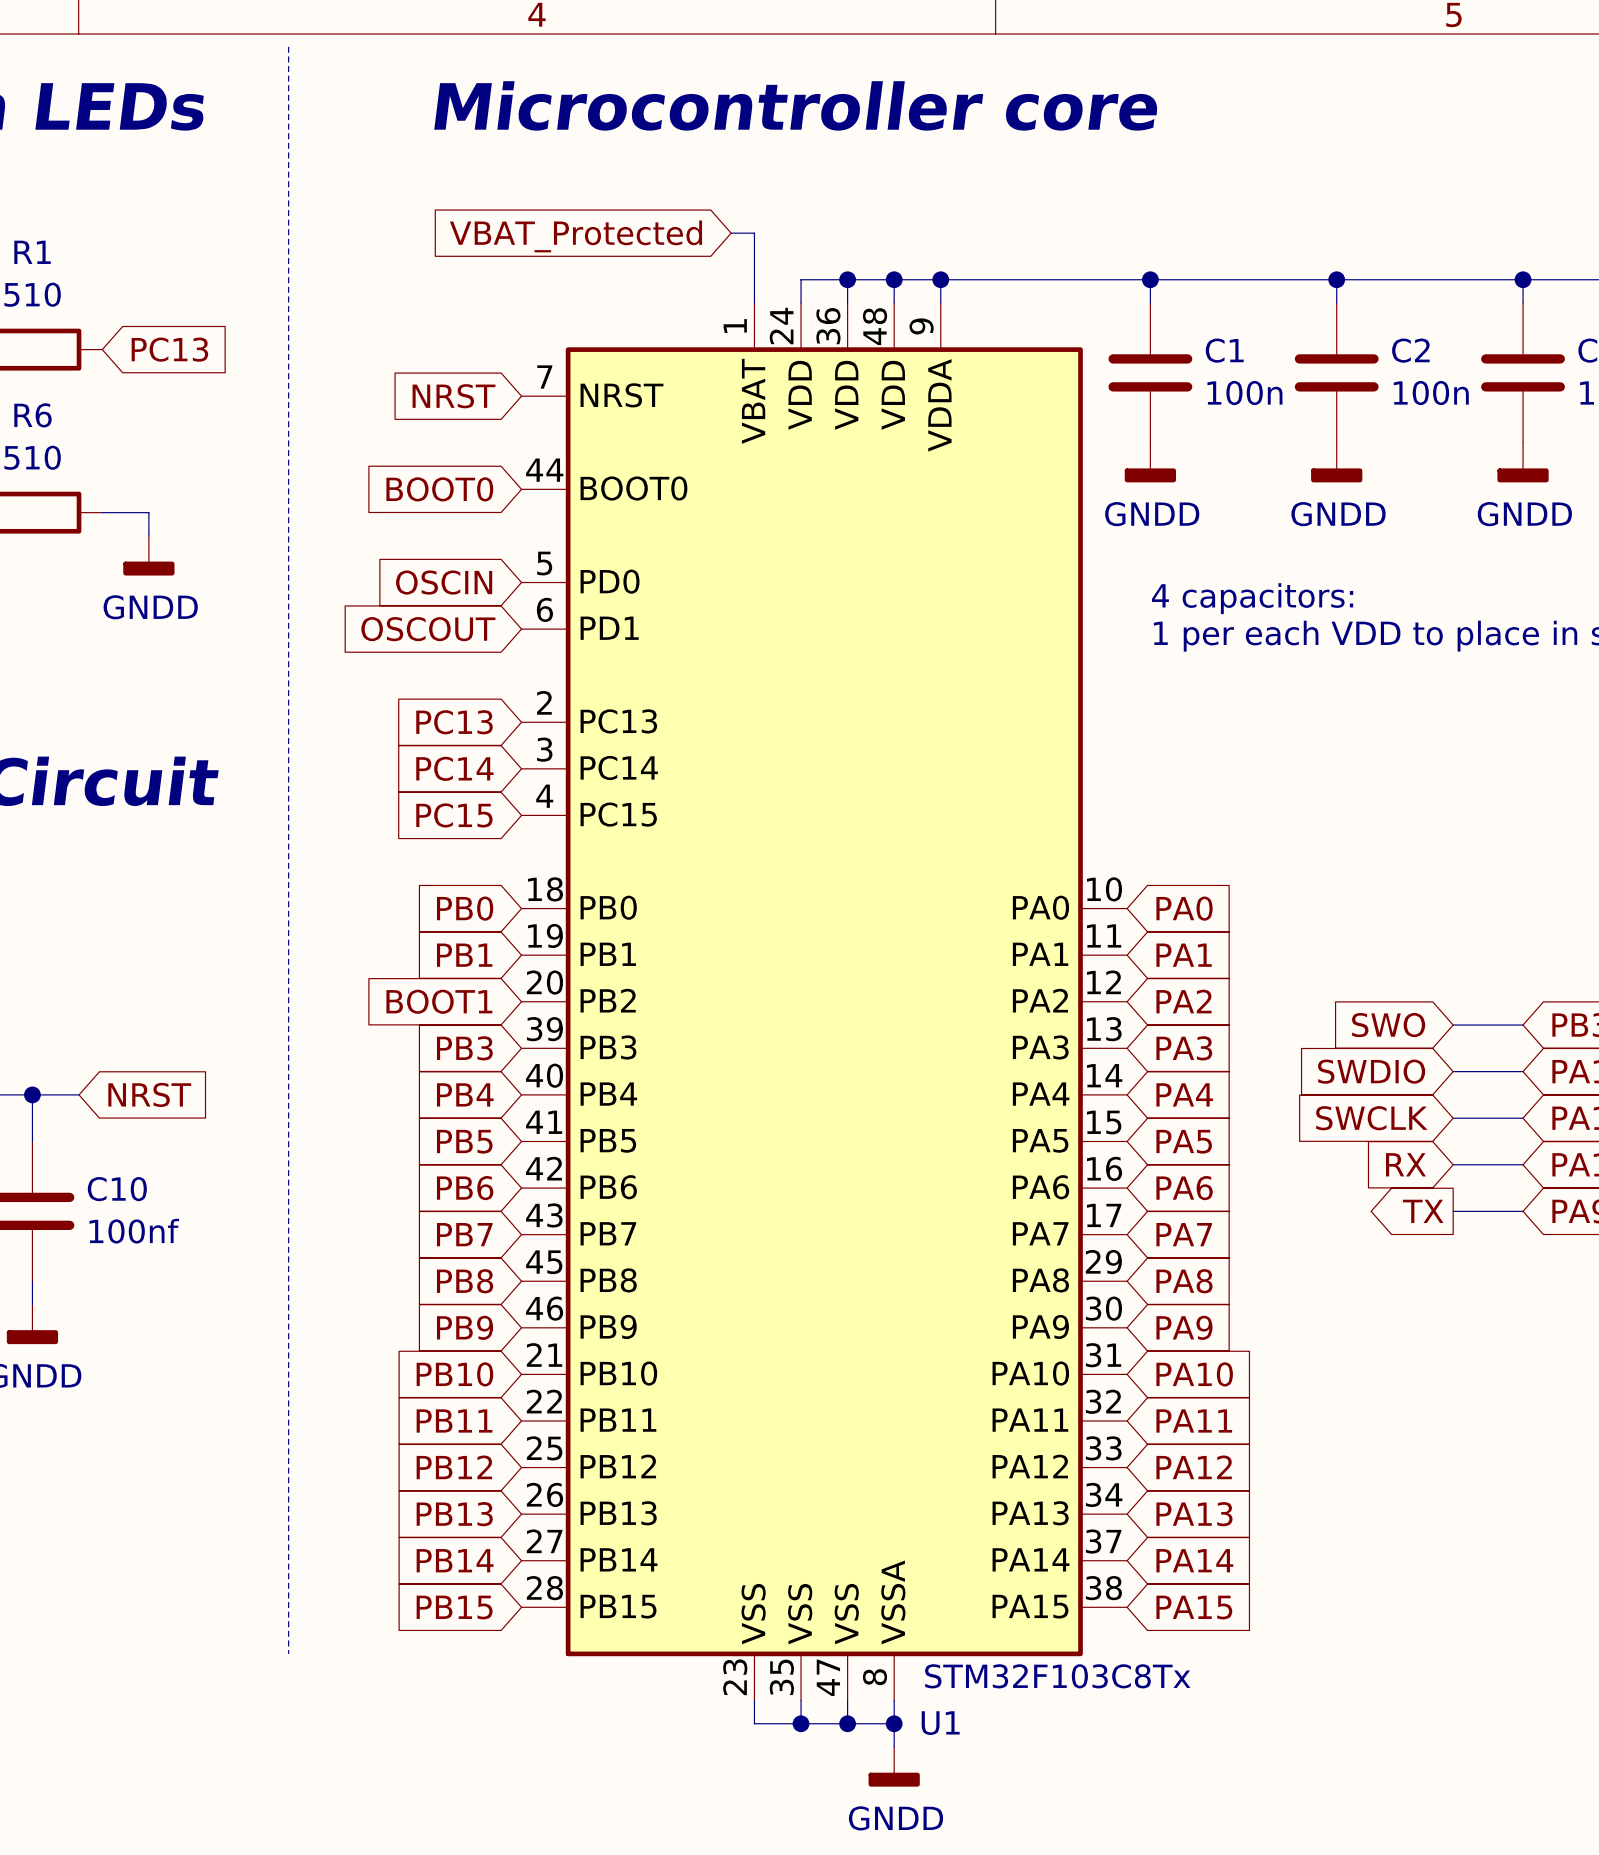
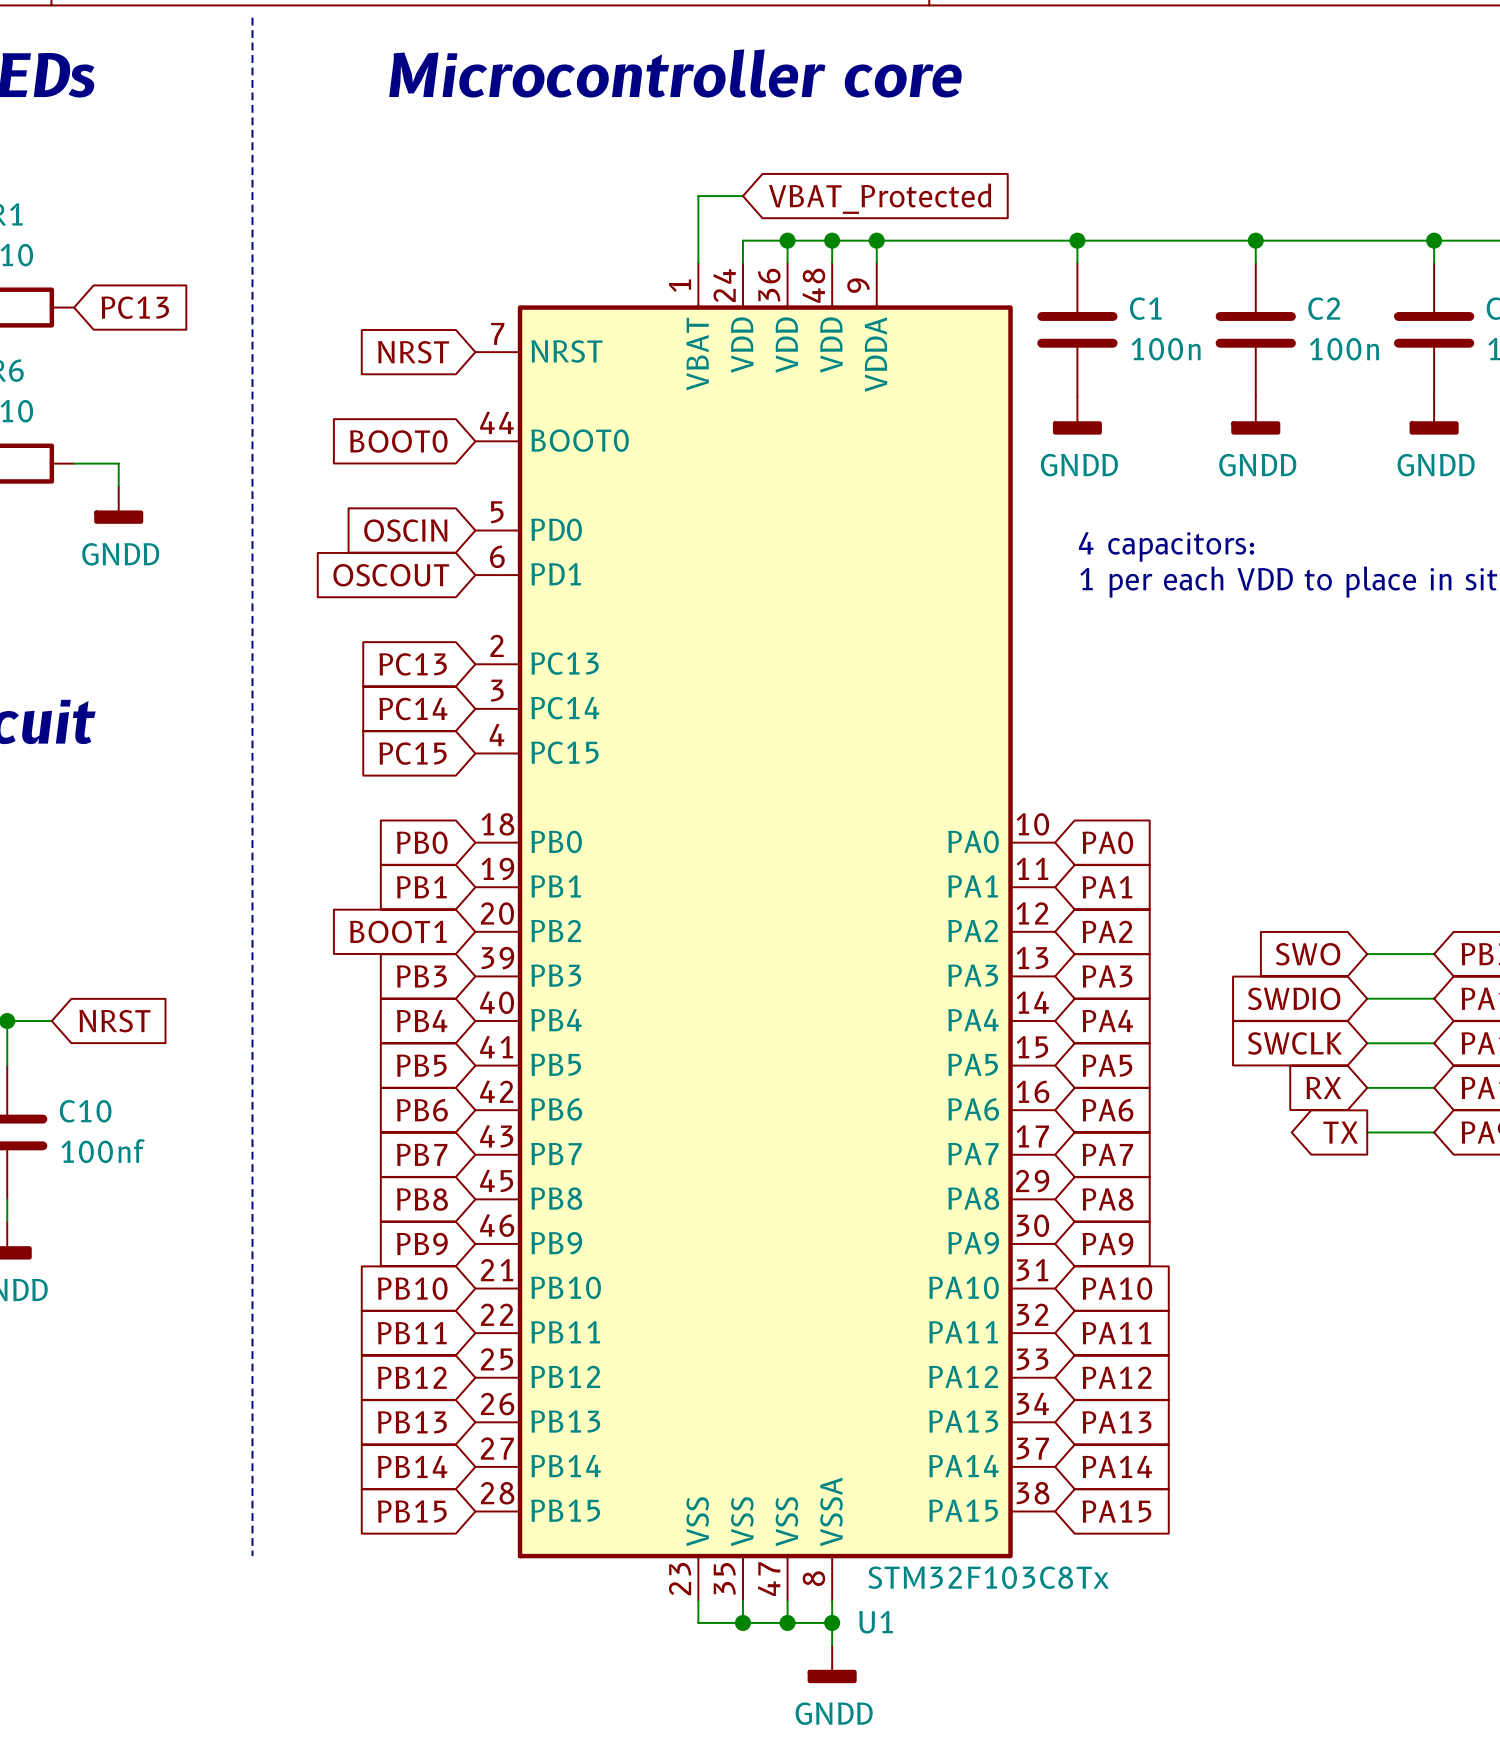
wire: (731, 233) (754, 233) -> (742, 196) (698, 196)
global label rotation: 0° (576, 236) -> 180° (880, 198)
global label position: VBAT_Protected (576, 236) -> VBAT_Protected (880, 198)

